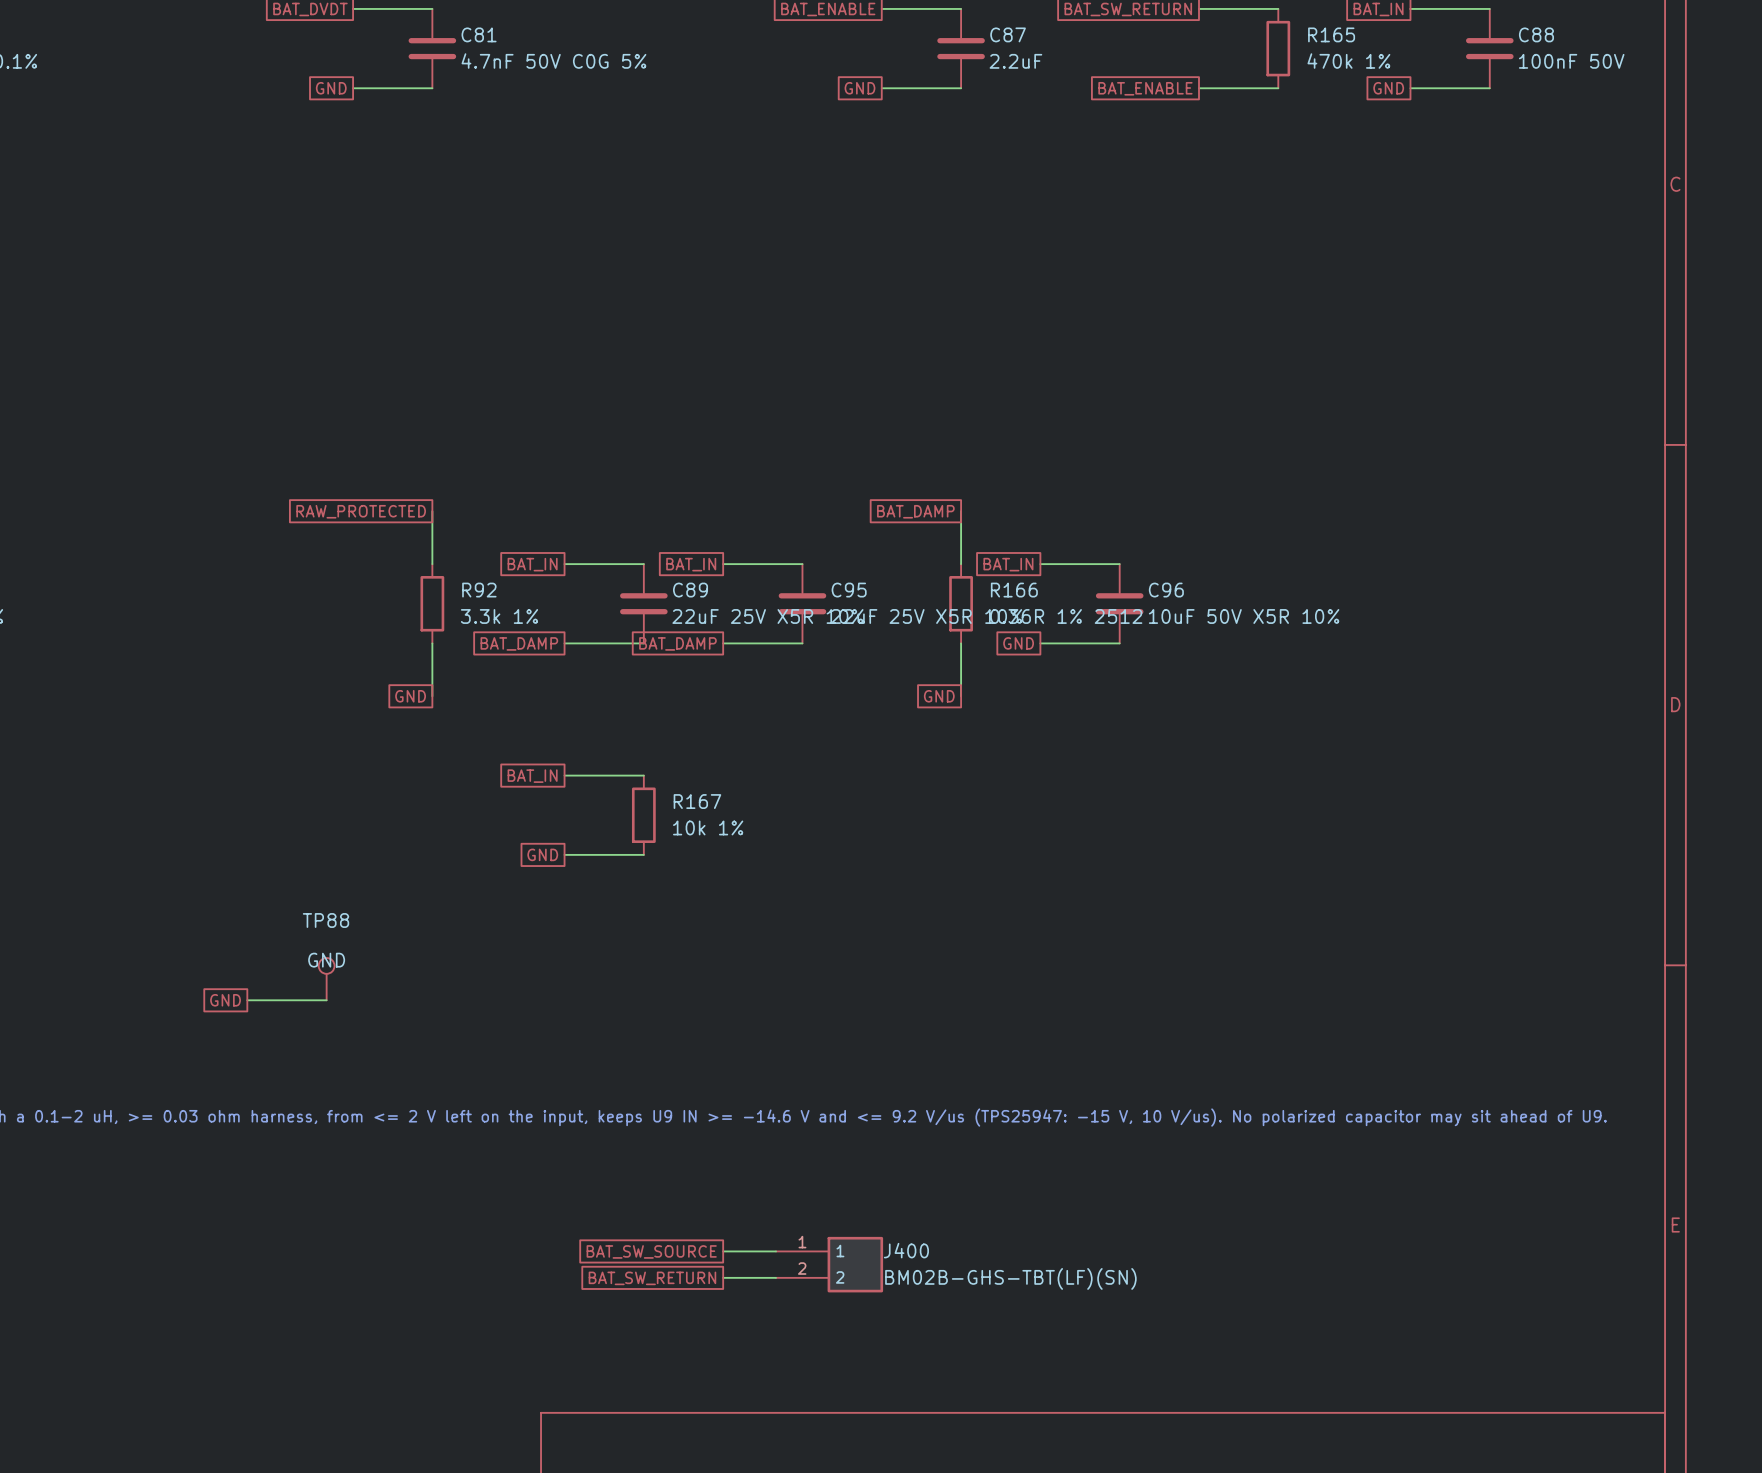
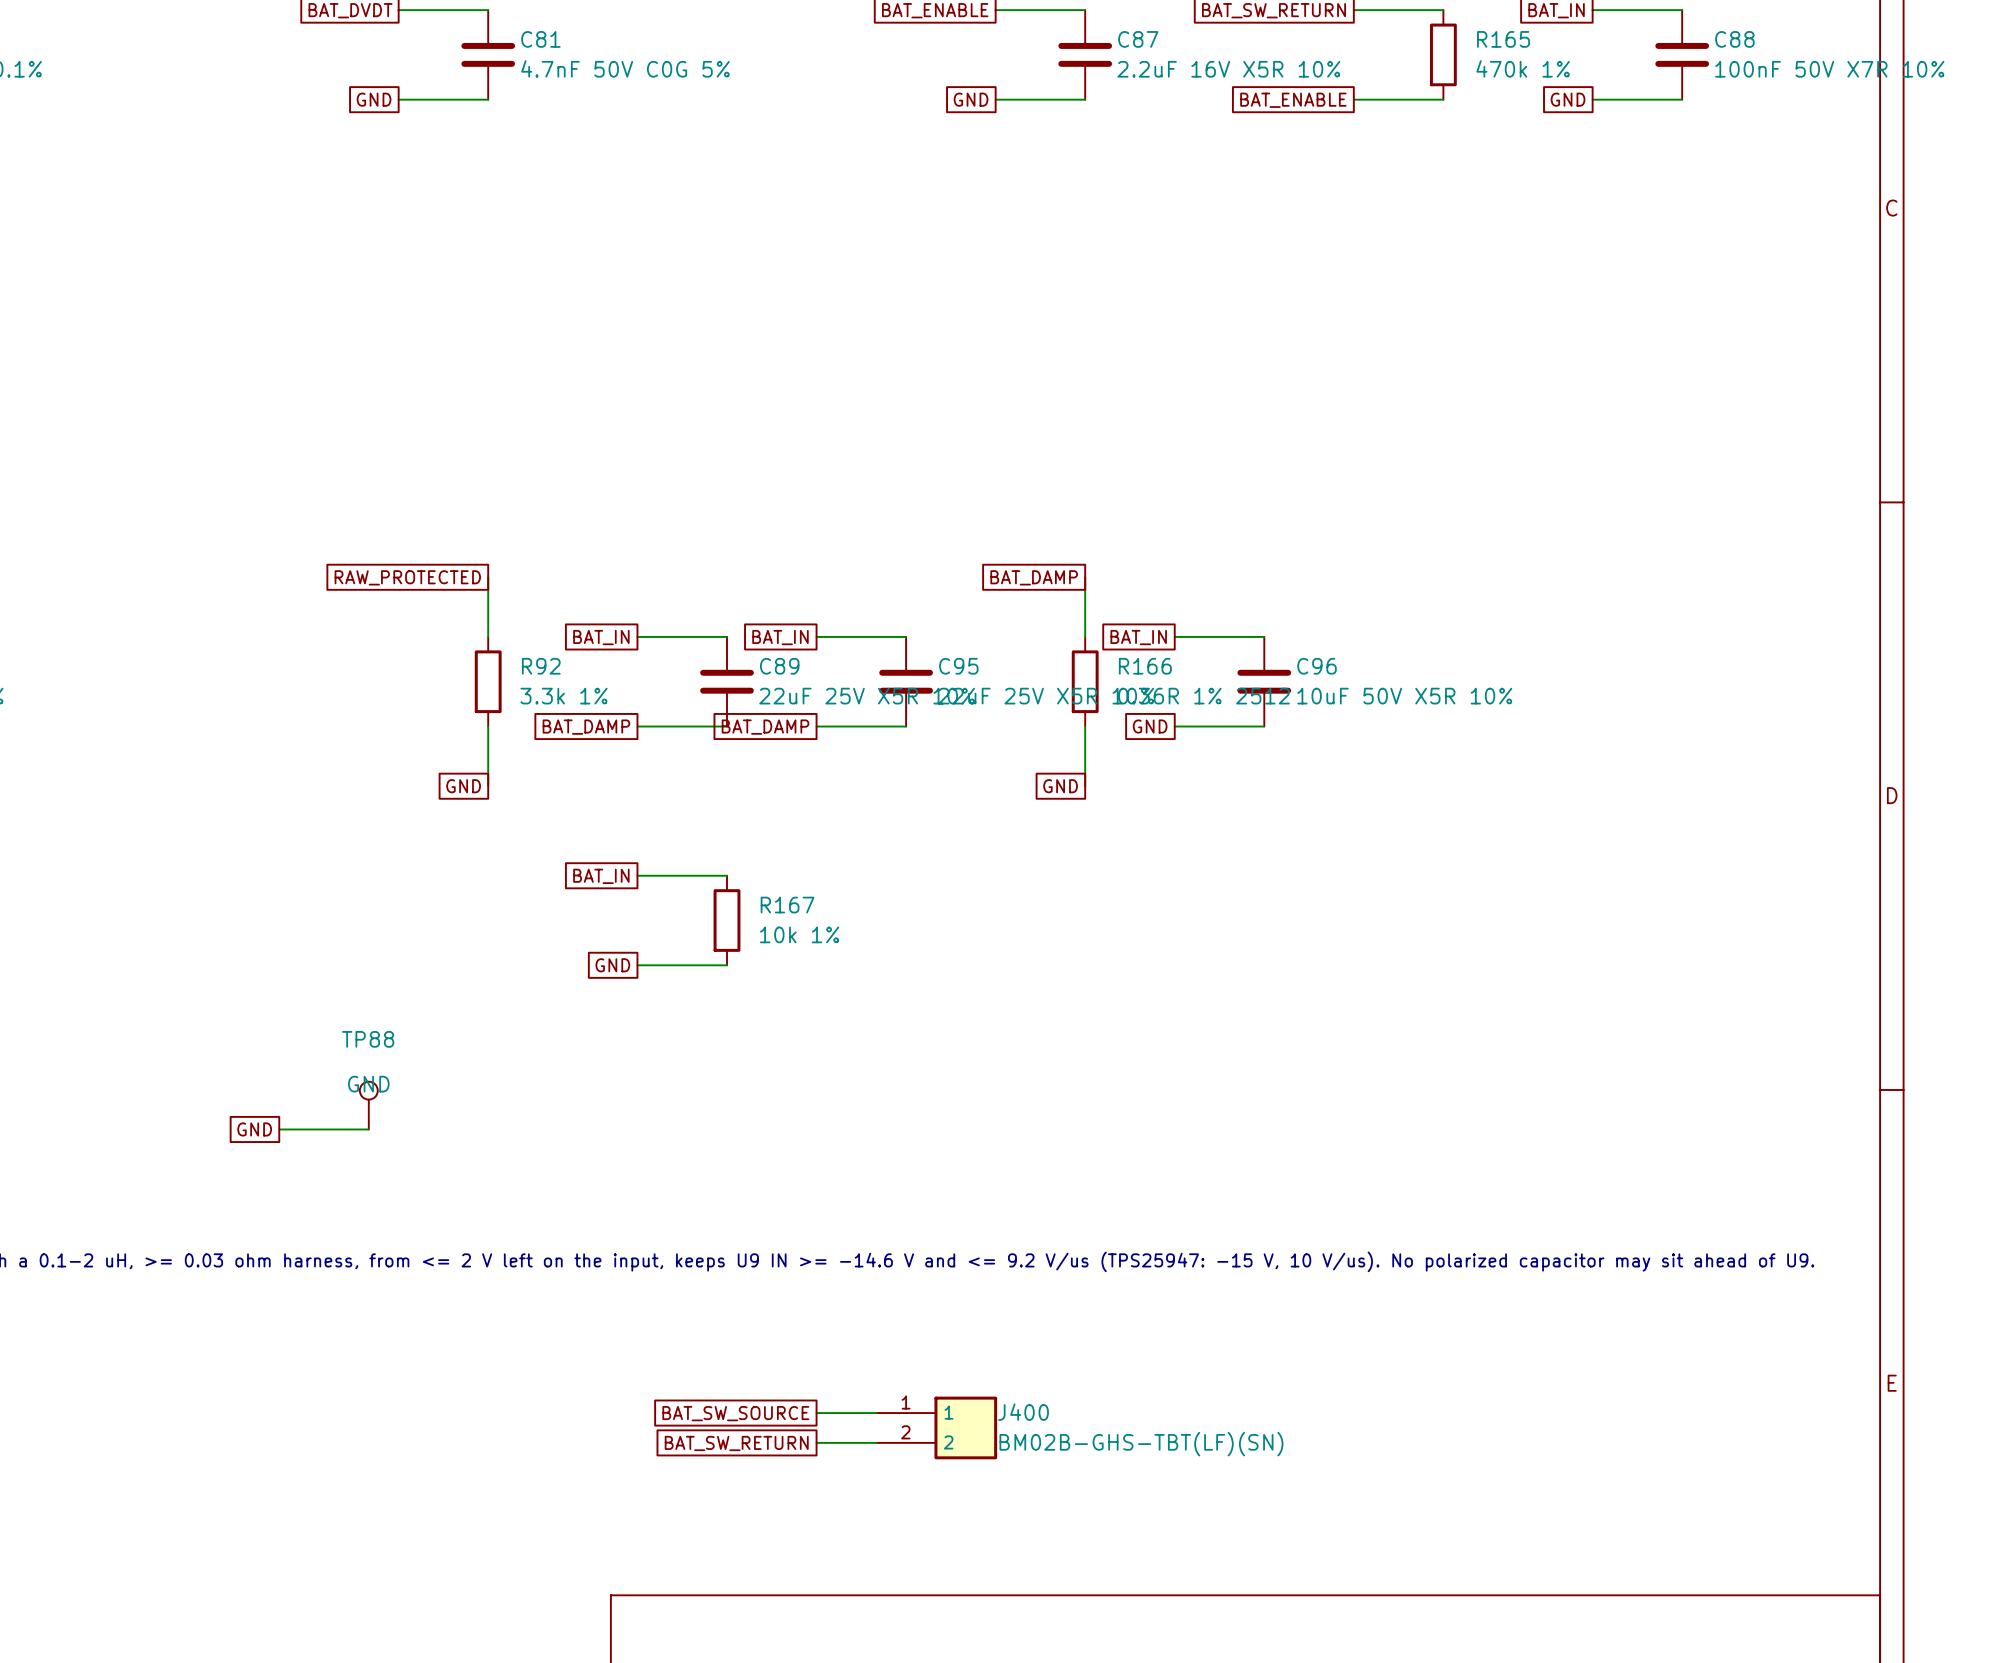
C87 value: 2.2uF (1015, 61) -> 2.2uF 16V X5R 10% (1228, 69)
C88 value: 100nF 50V (1571, 61) -> 100nF 50V X7R 10% (1829, 69)

